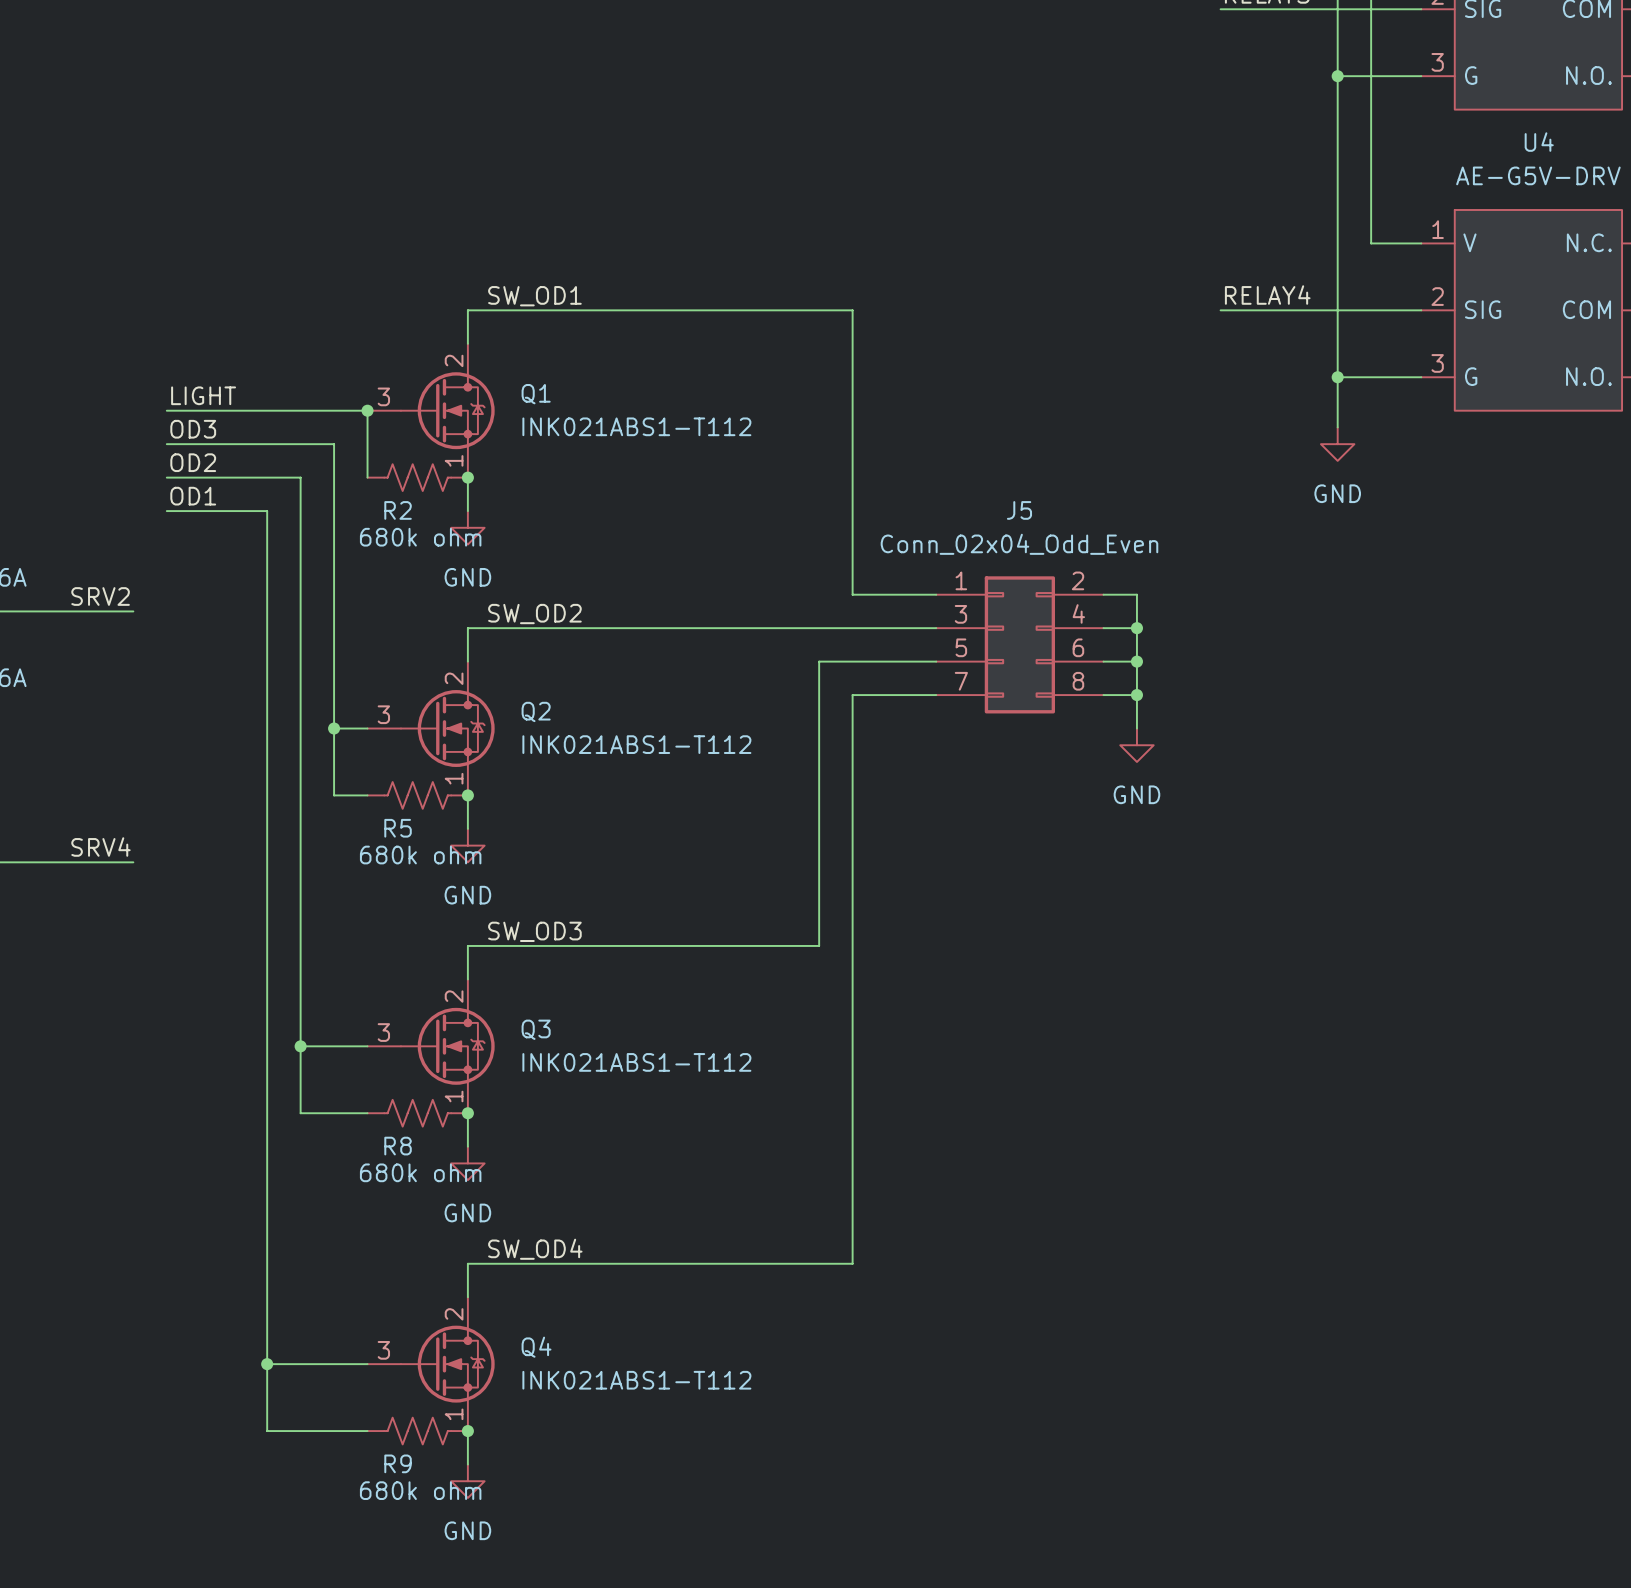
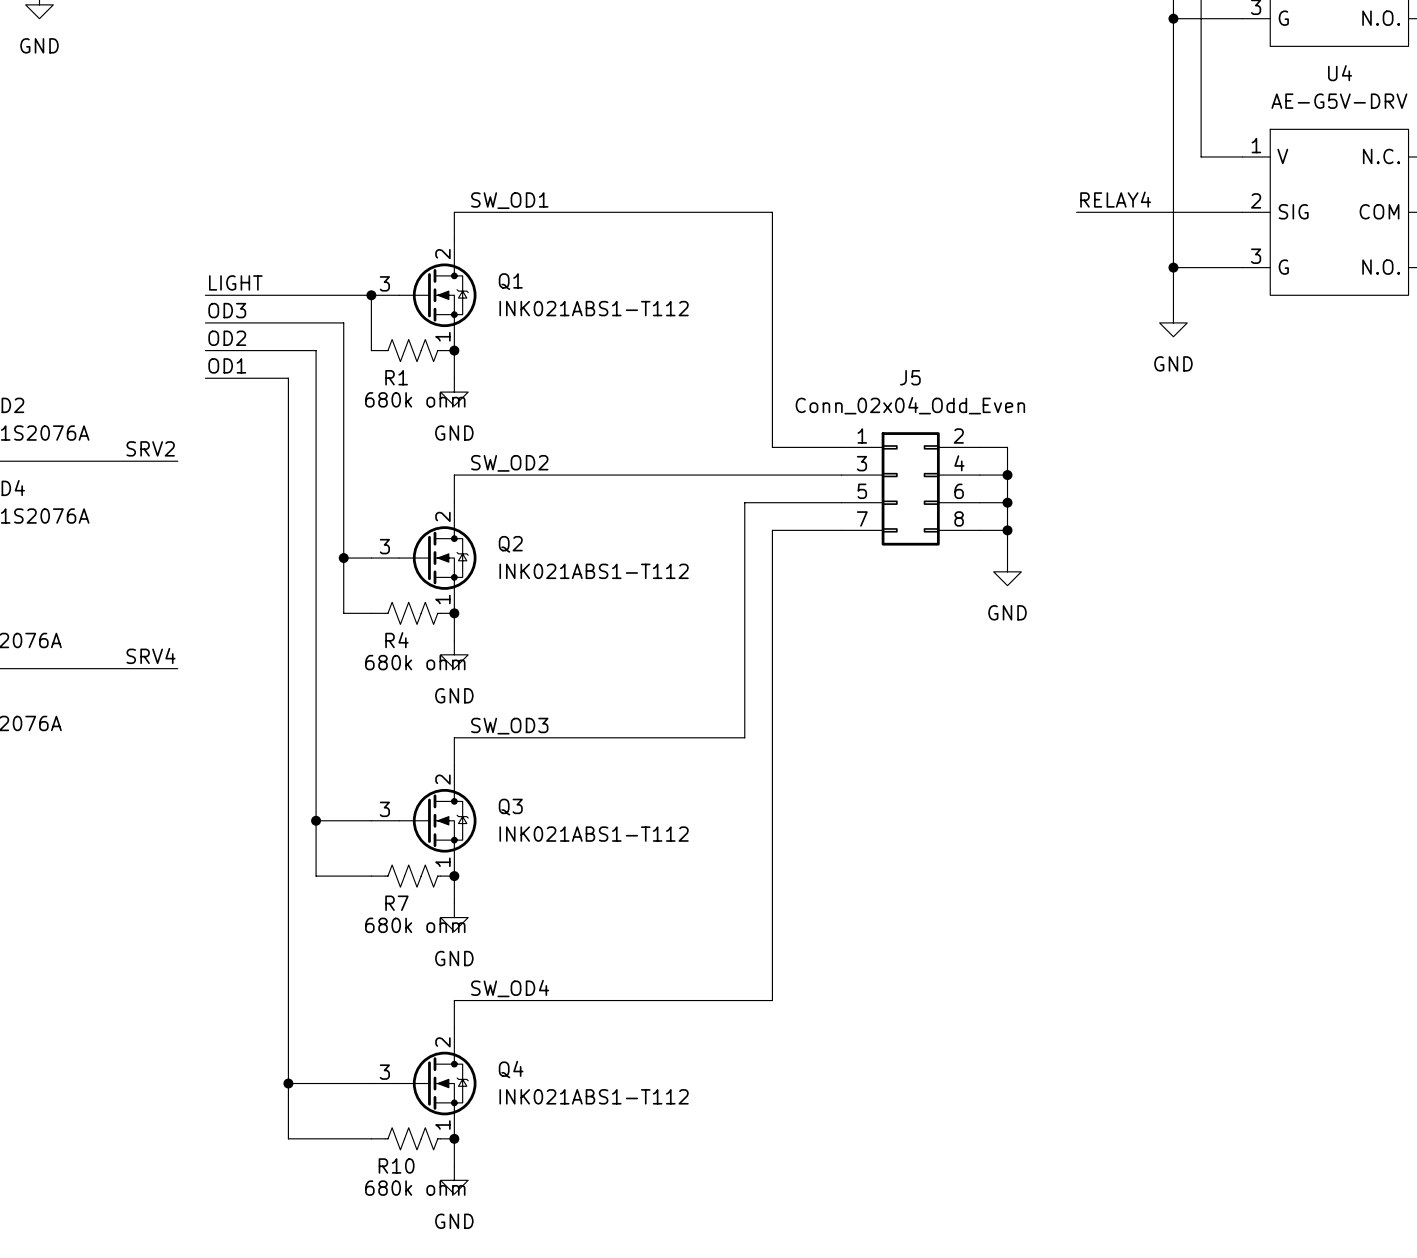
R2 name: R2 (398, 510) -> R1 (396, 377)
R5 name: R5 (398, 828) -> R4 (396, 640)
R8 name: R8 (398, 1146) -> R7 (396, 903)
R9 name: R9 (398, 1463) -> R10 (396, 1165)

